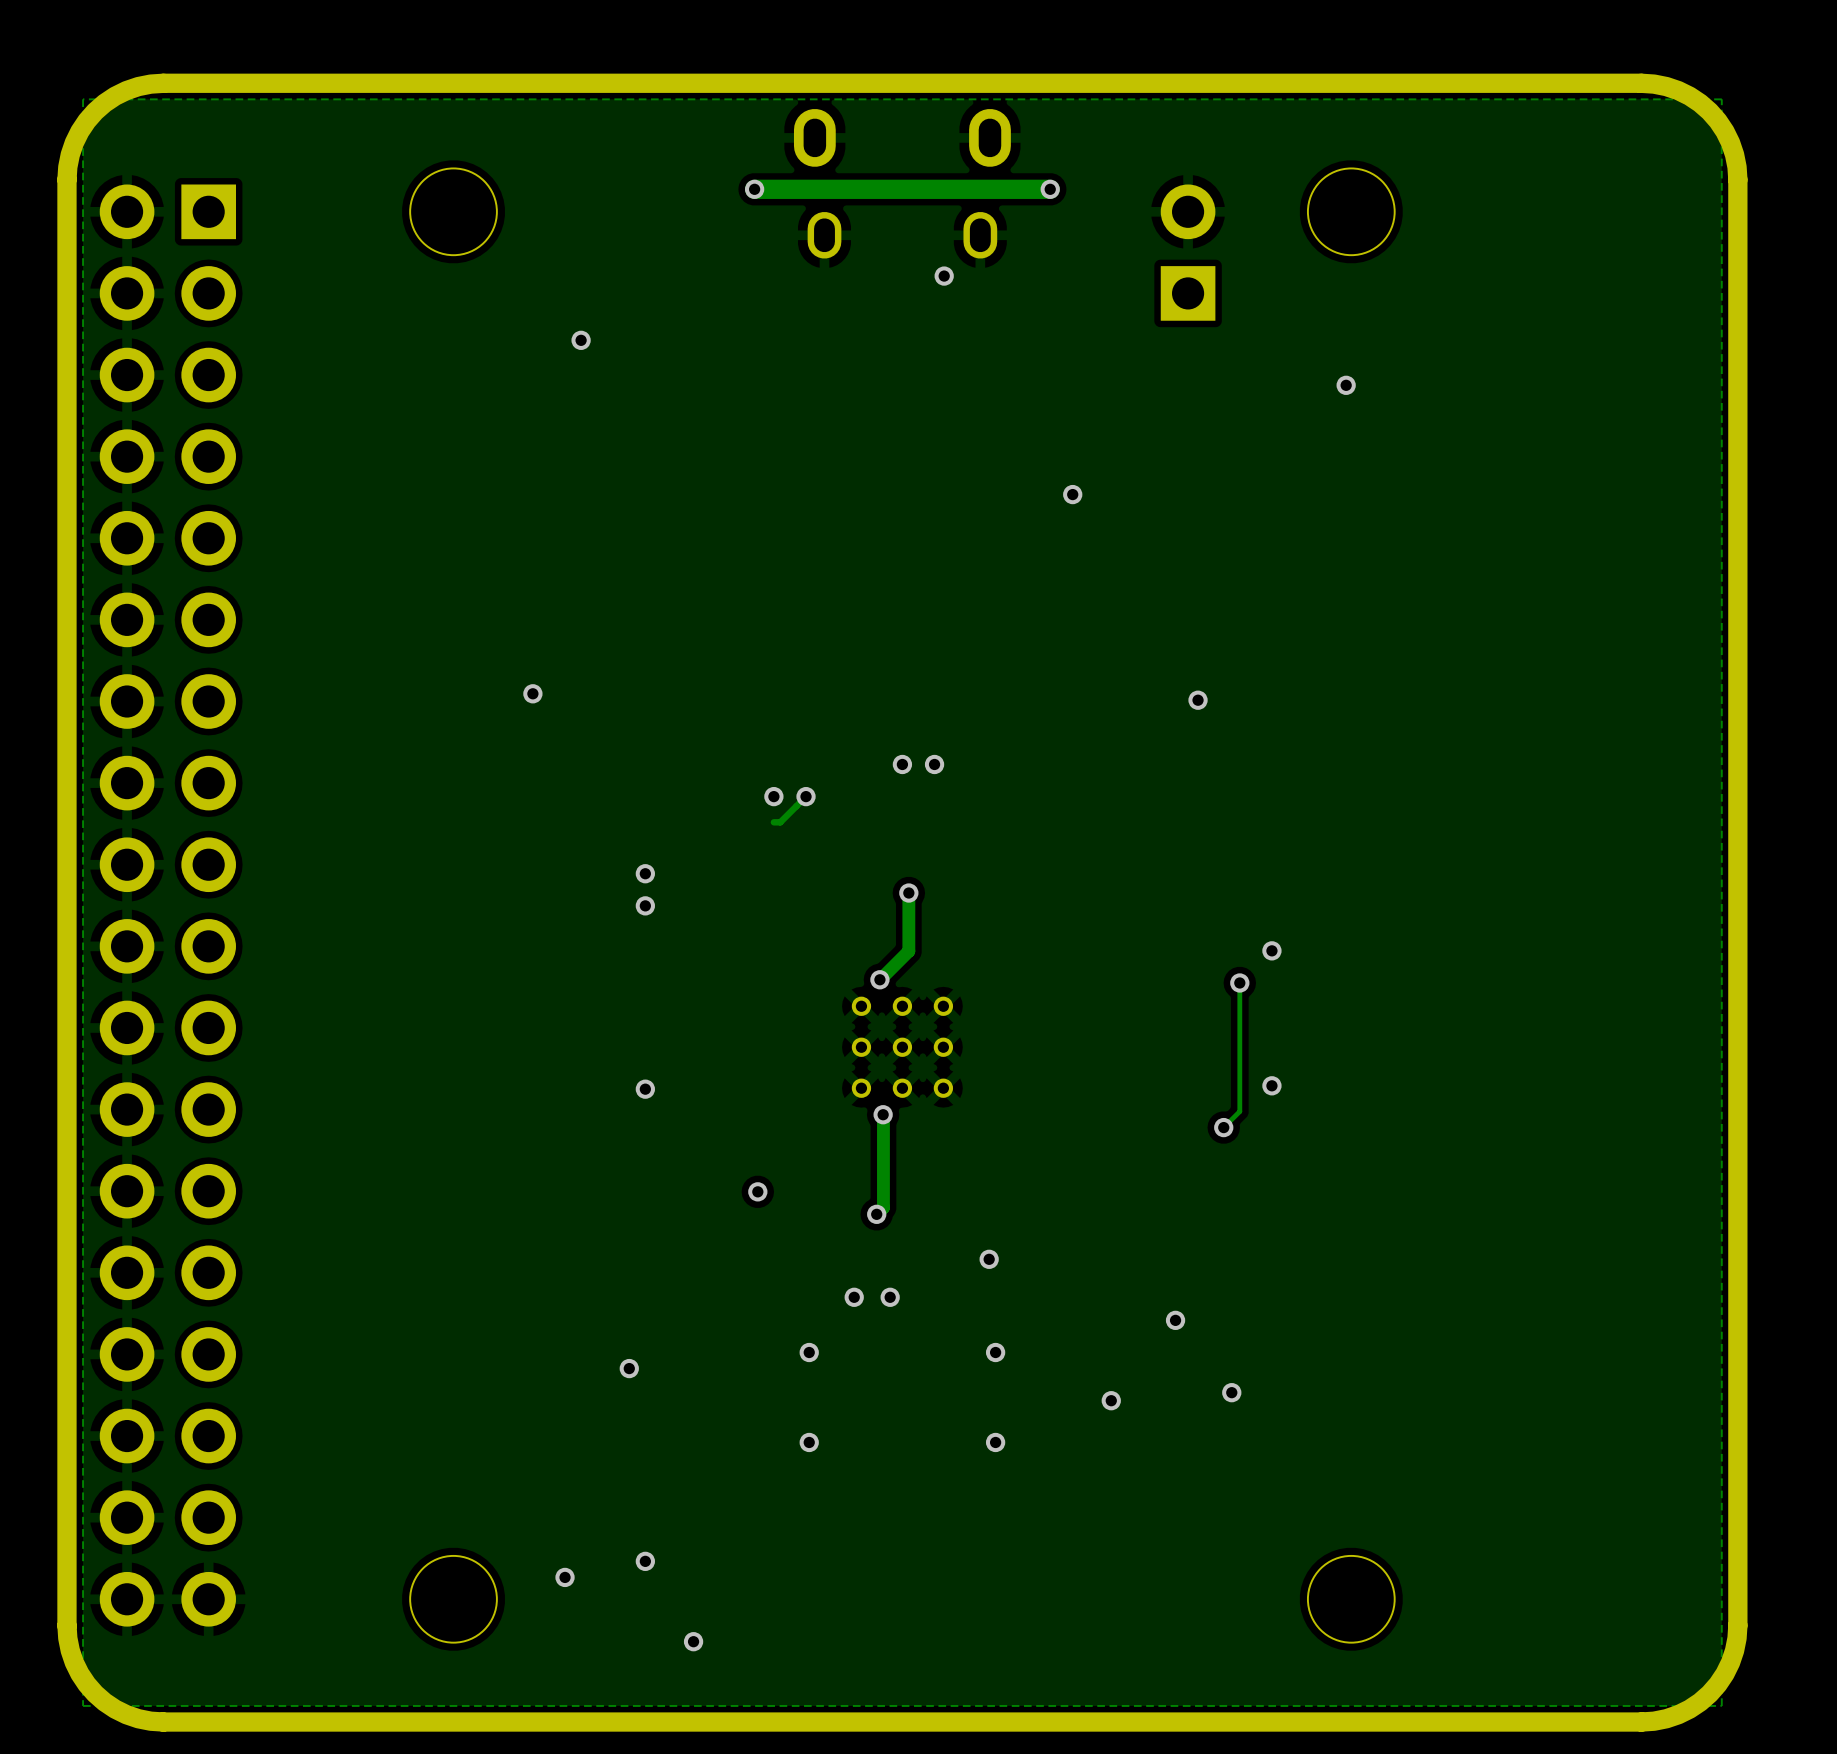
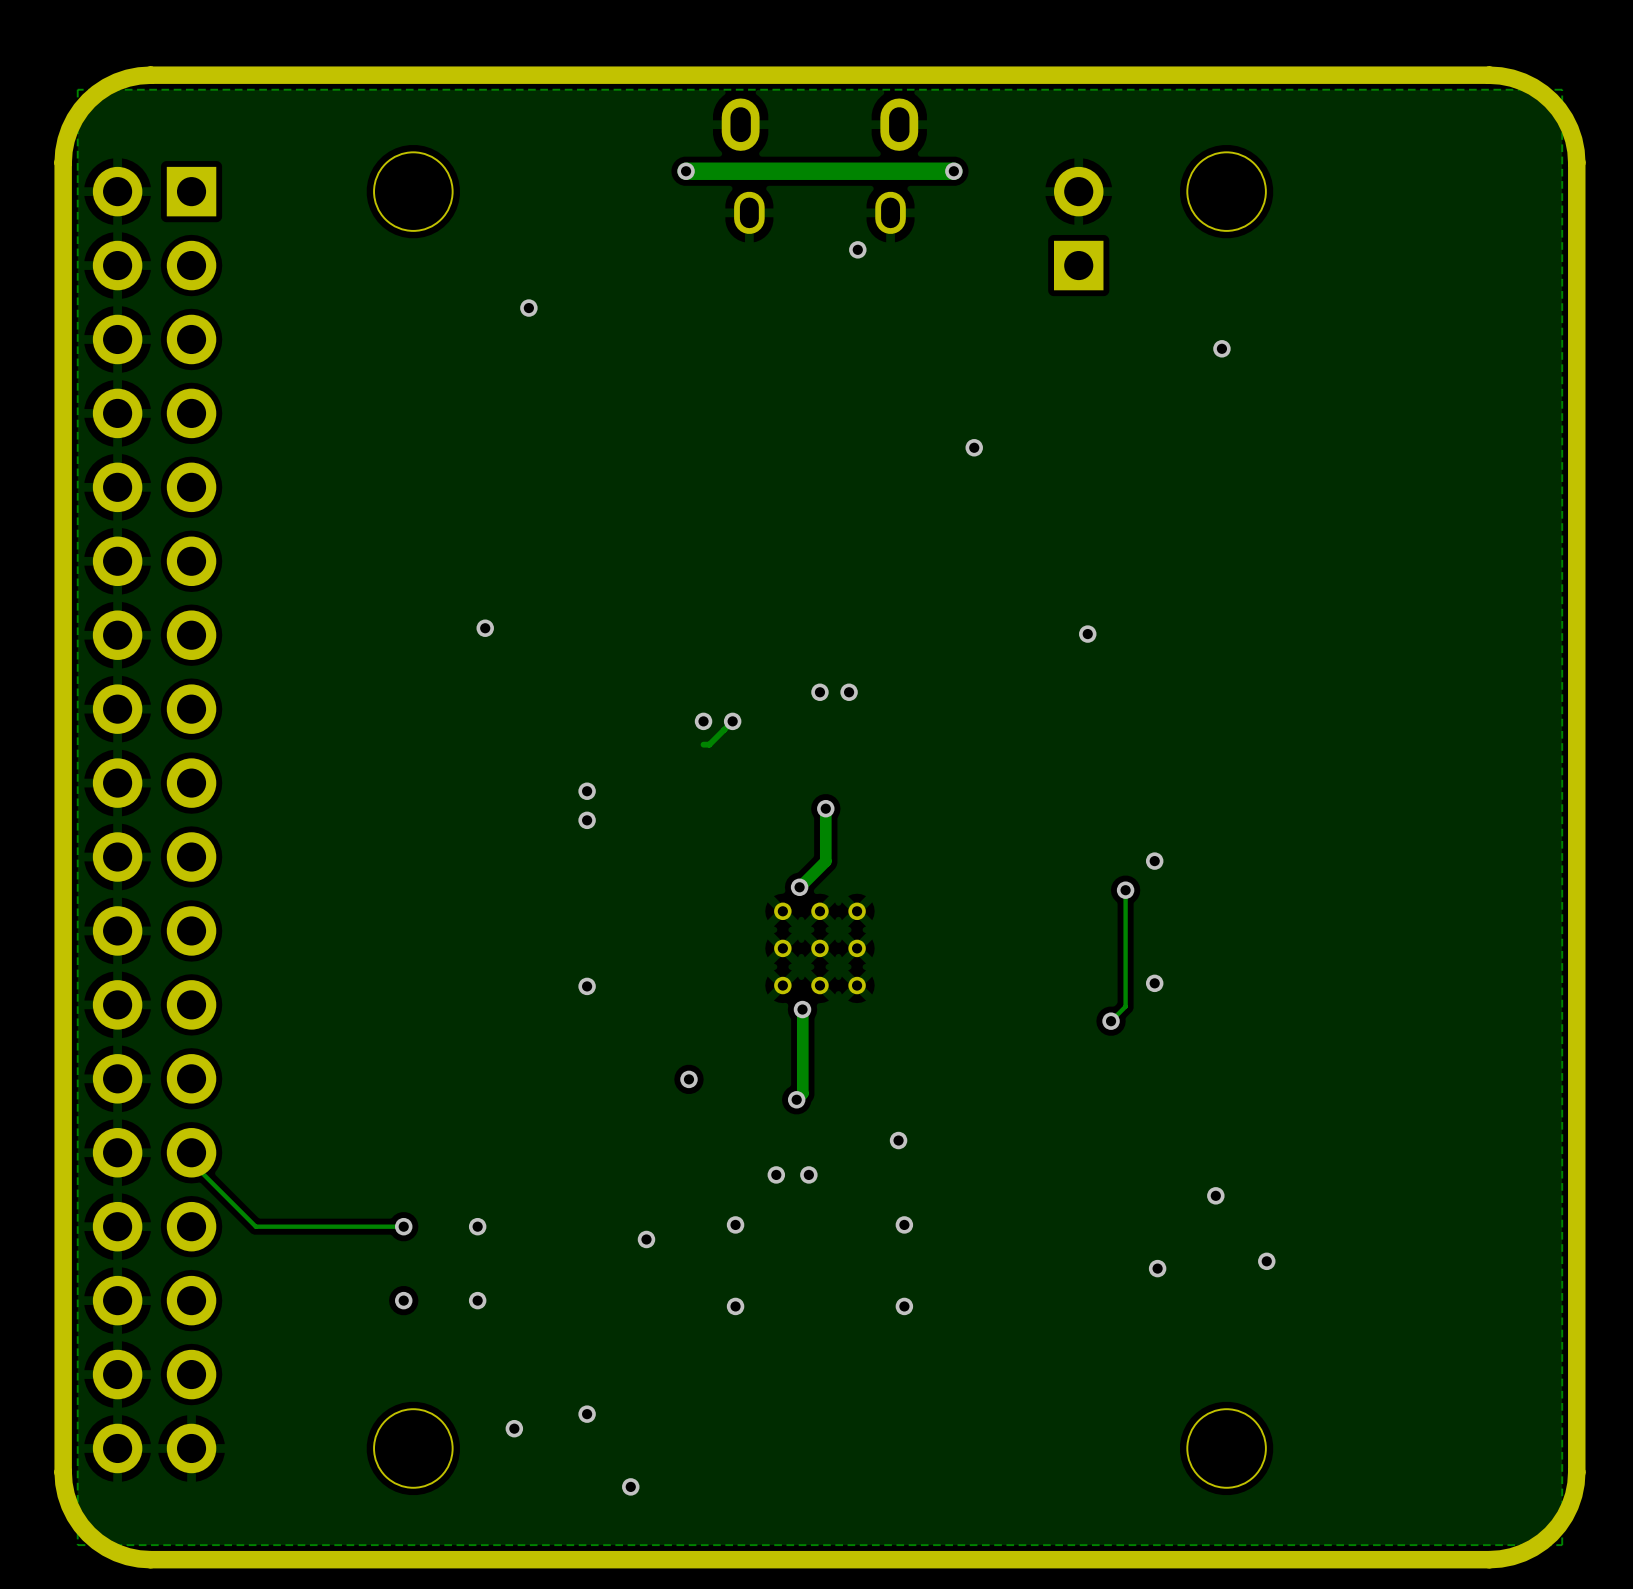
track: none -> (181, 1152) (255, 1226) (403, 1226)
via: (1175, 1320) -> none
via: none -> (1215, 1195)
via: none -> (403, 1226)
via: none -> (477, 1226)
via: (629, 1368) -> none
via: none -> (646, 1239)
via position: (1231, 1392) -> (1157, 1268)
via: none -> (1266, 1261)
via: (1111, 1400) -> none
via: none -> (403, 1300)
via: none -> (477, 1300)

